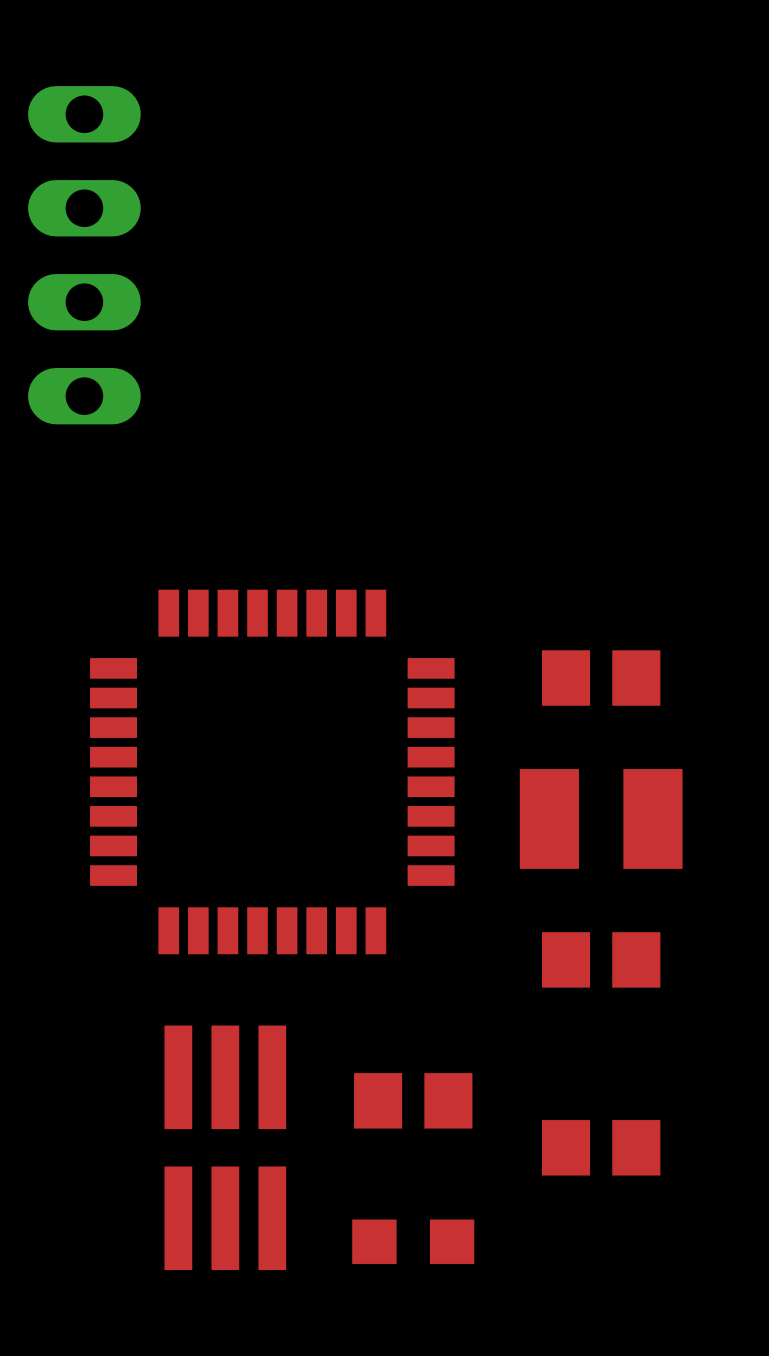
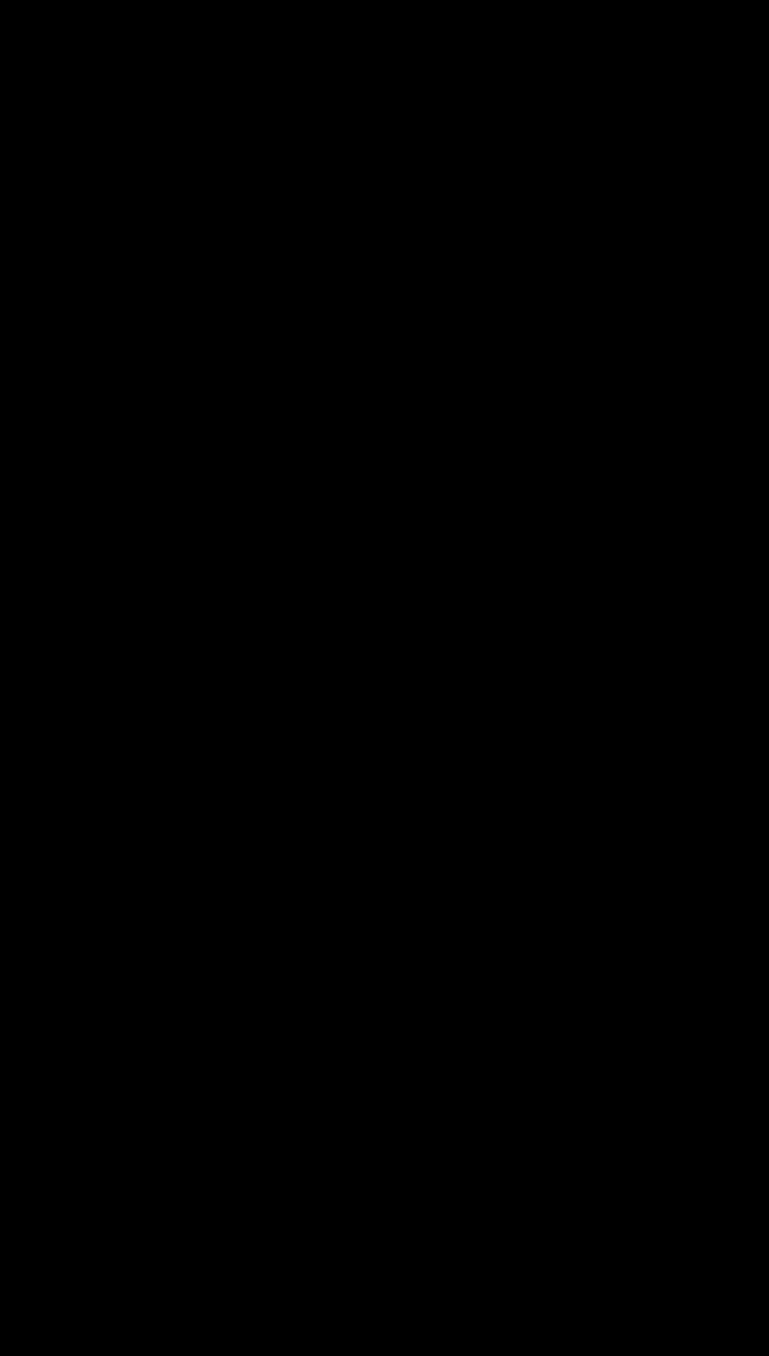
part: (84, 255) -> none
part: (601, 678) -> none
part: (272, 771) -> none
part: (601, 818) -> none
part: (601, 959) -> none
part: (413, 1100) -> none
part: (225, 1147) -> none
part: (601, 1147) -> none
part: (413, 1241) -> none

